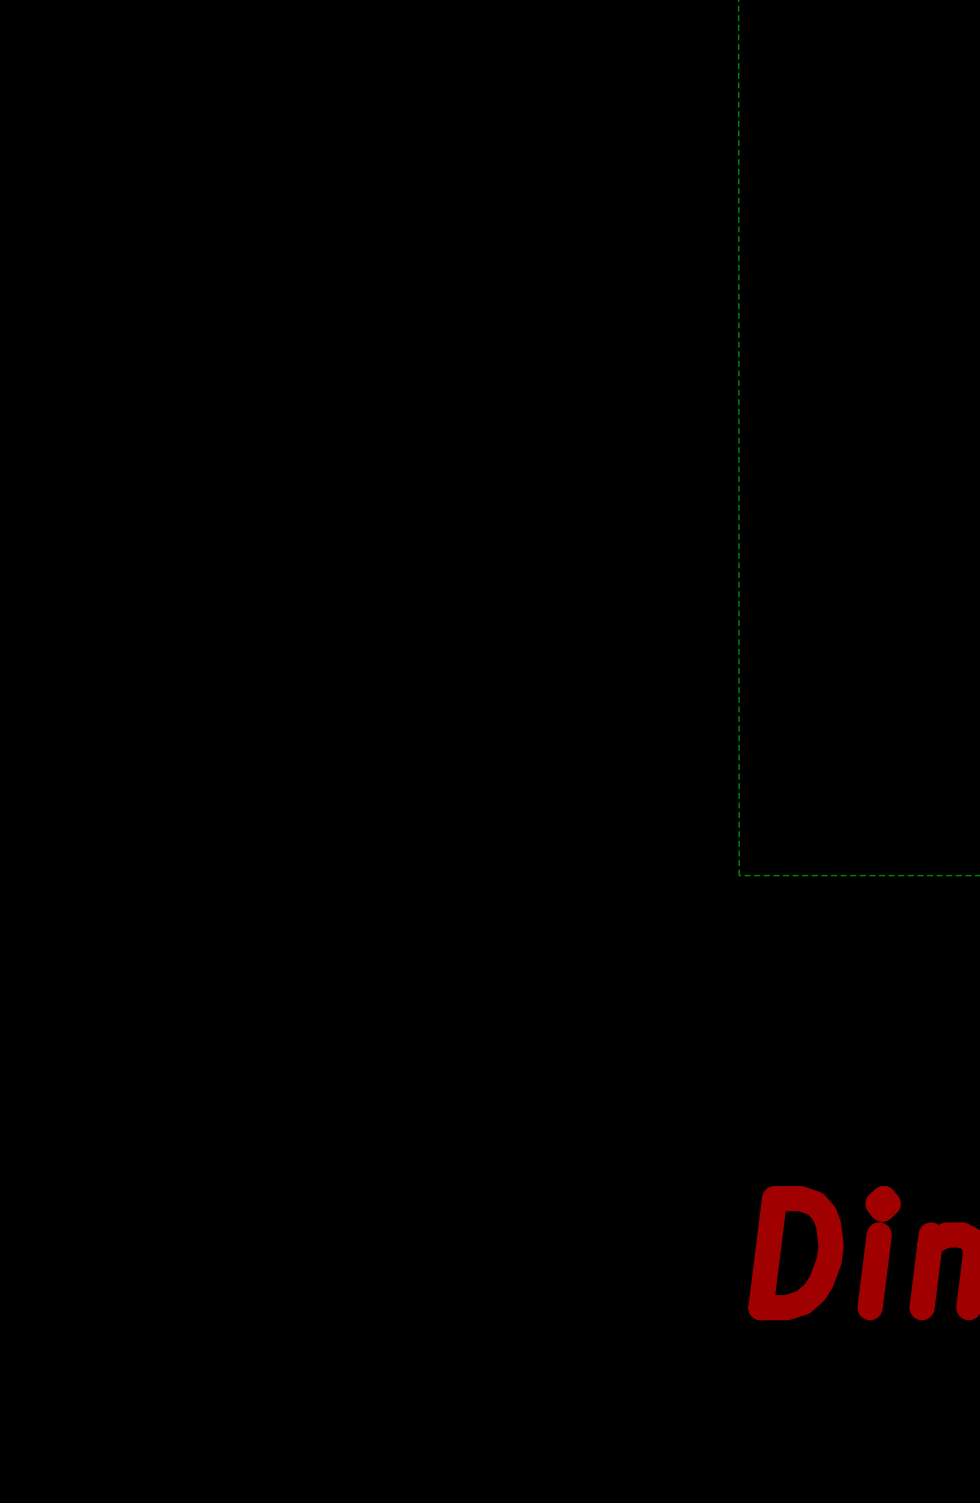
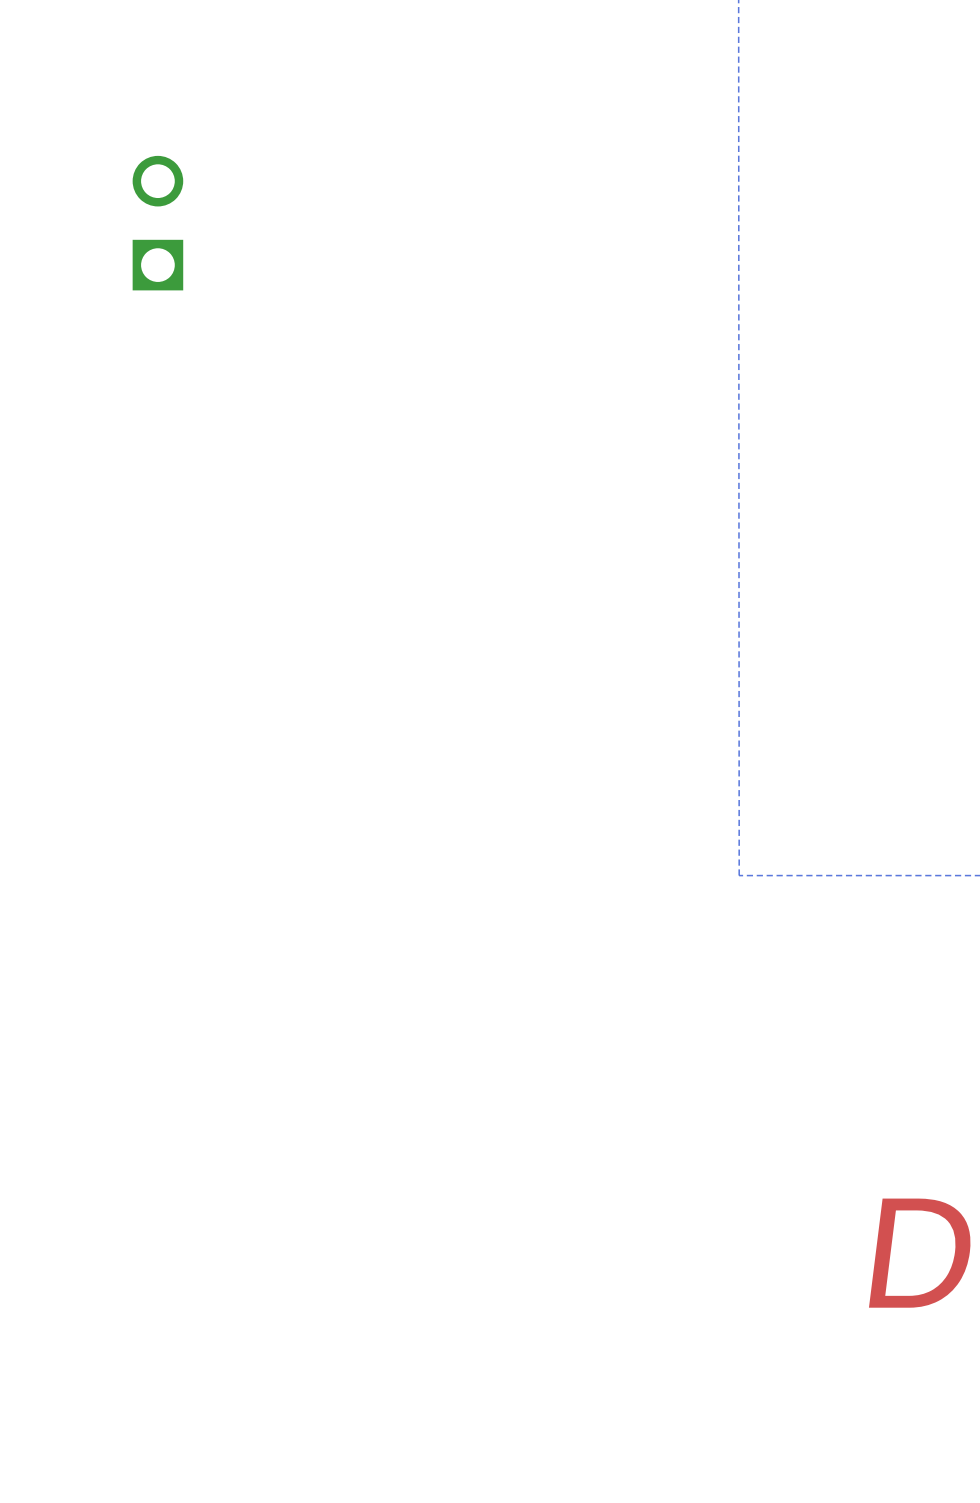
part: none -> (157, 223)

